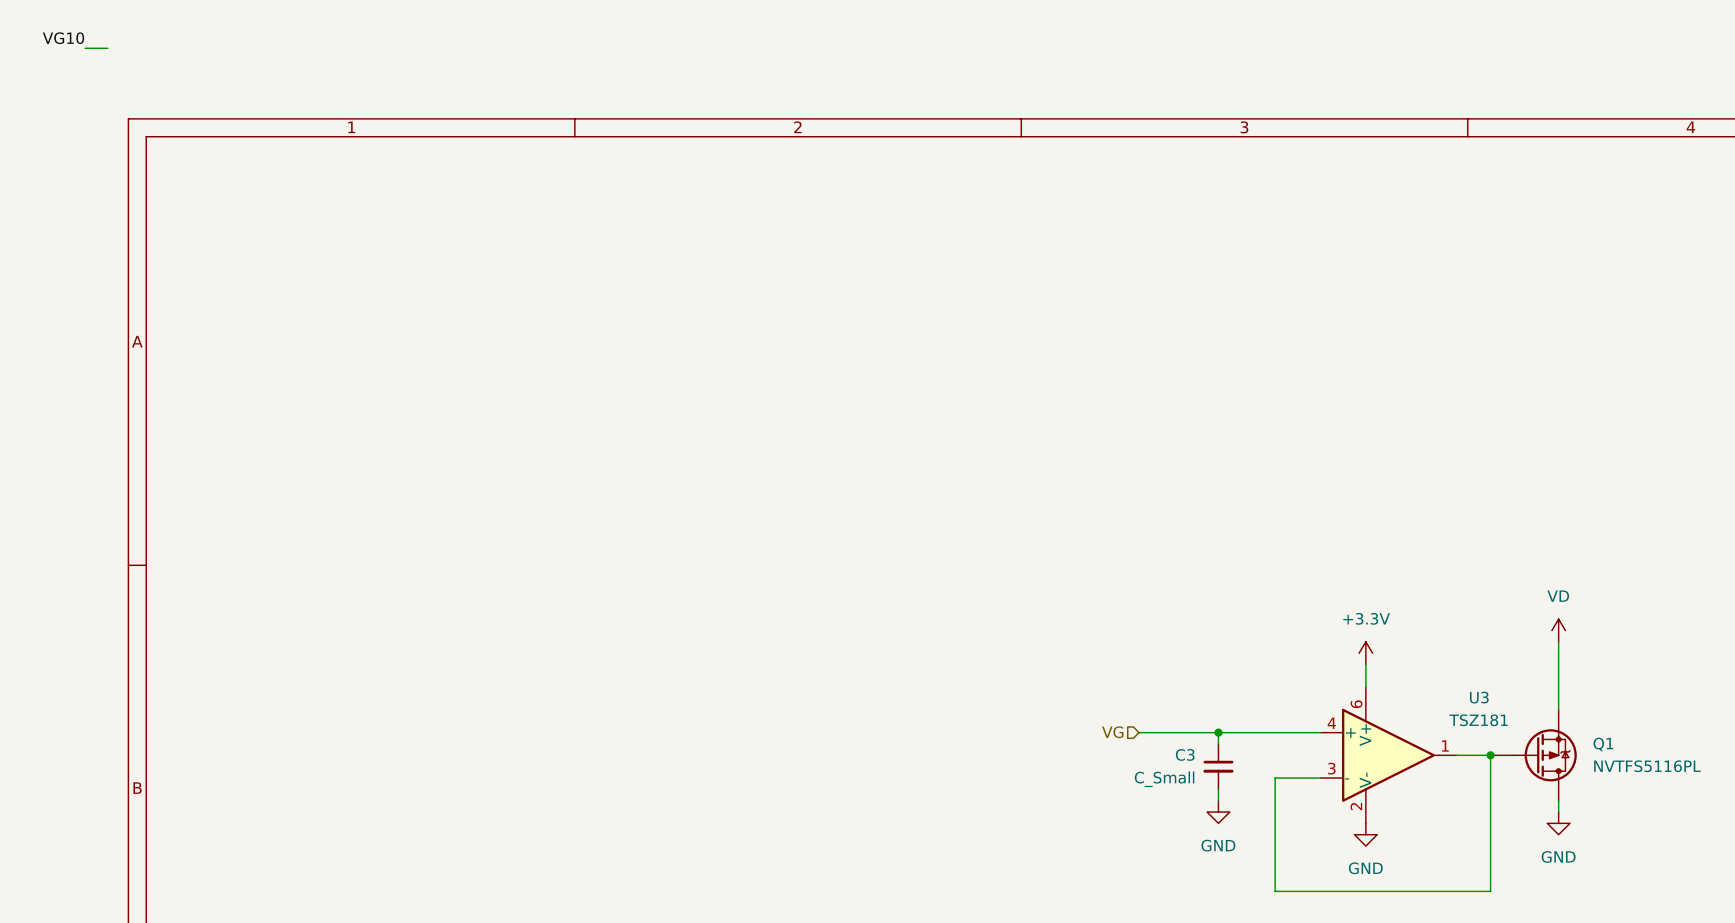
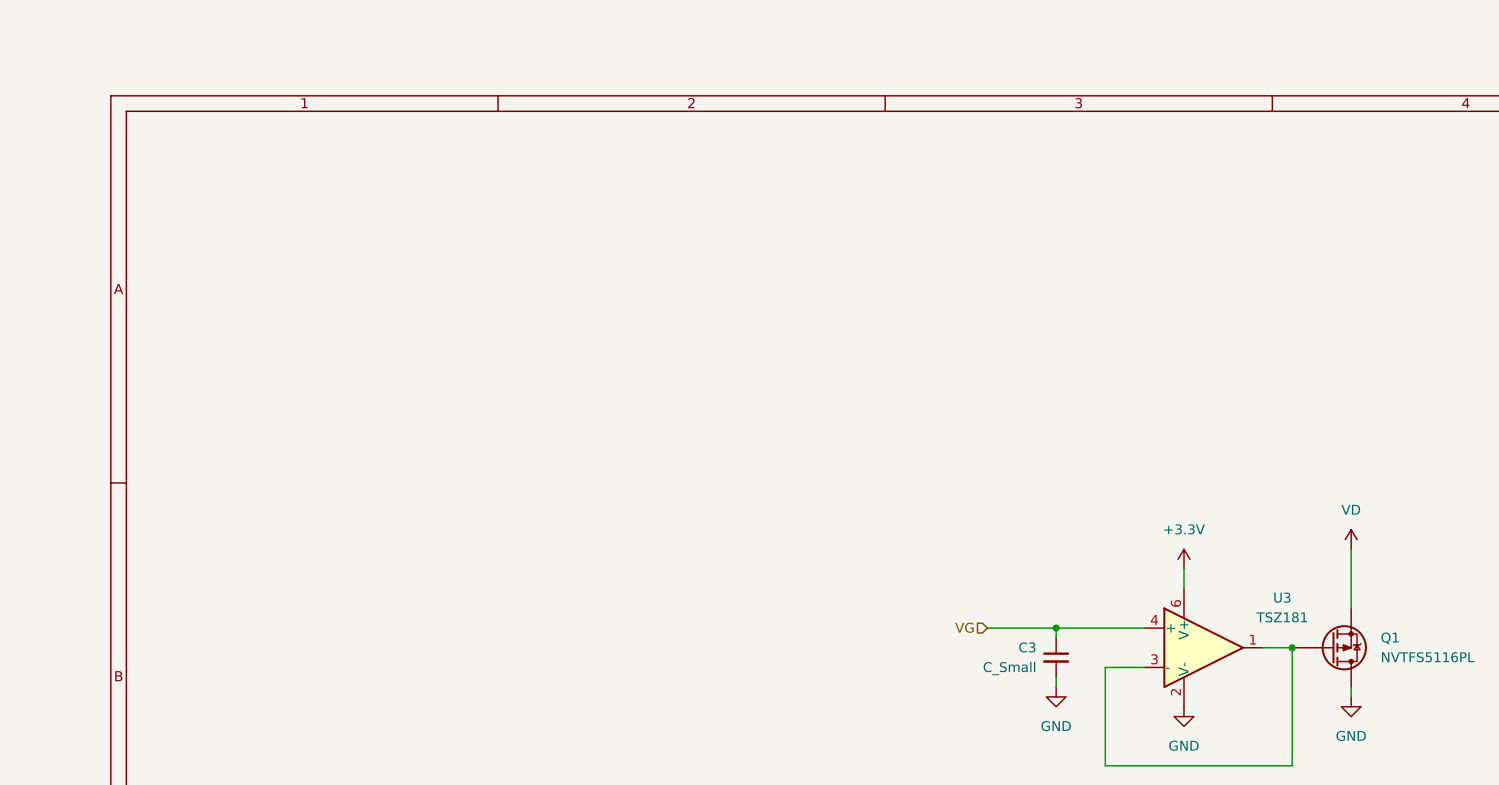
label: VG10 (63, 38) -> none
wire: (85, 48) (107, 48) -> none

